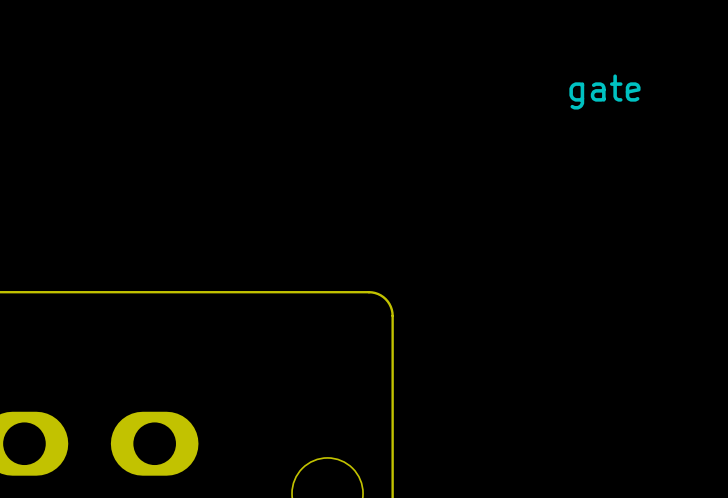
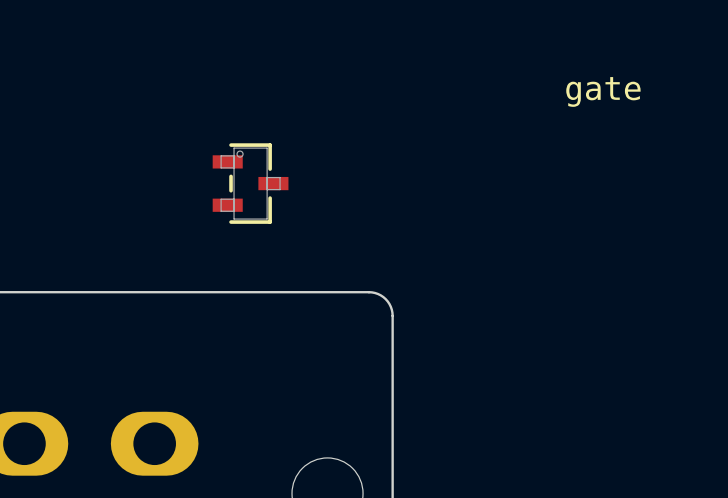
part: none -> (250, 183)

